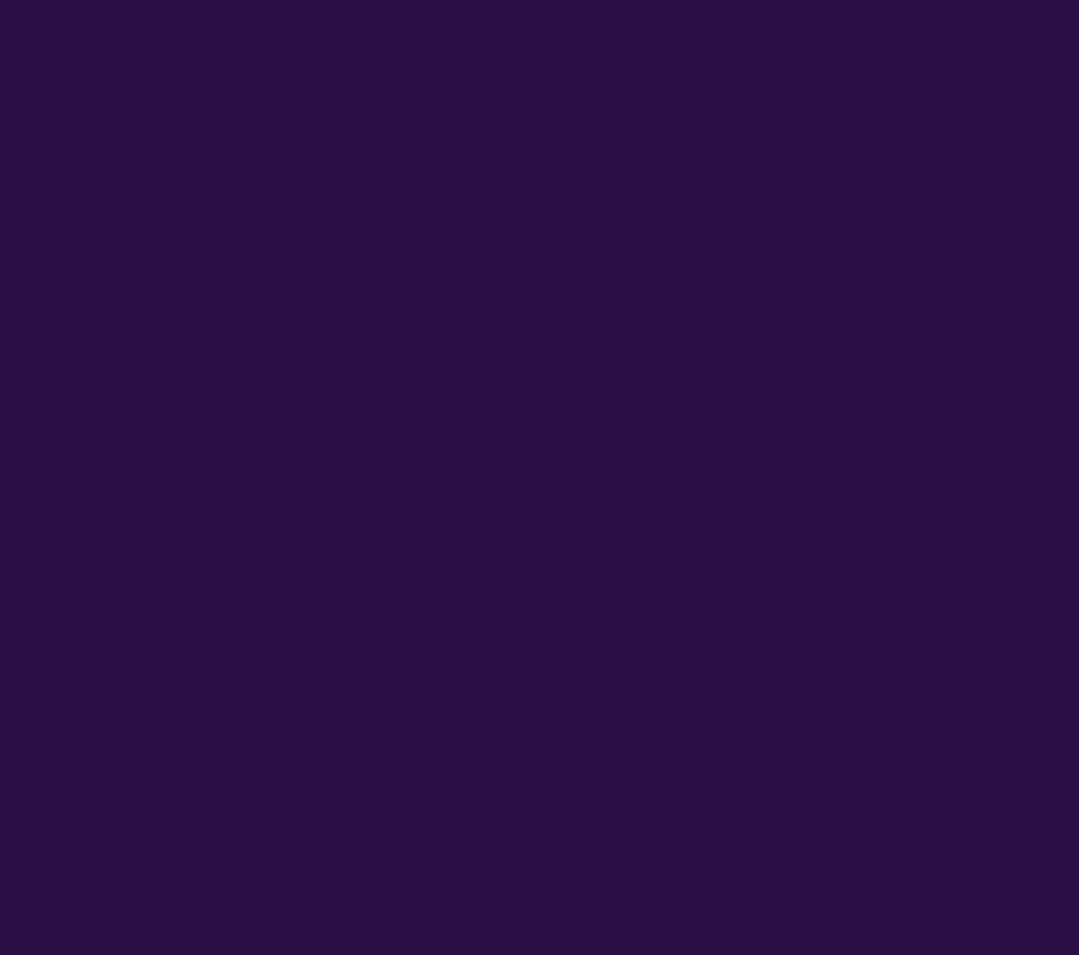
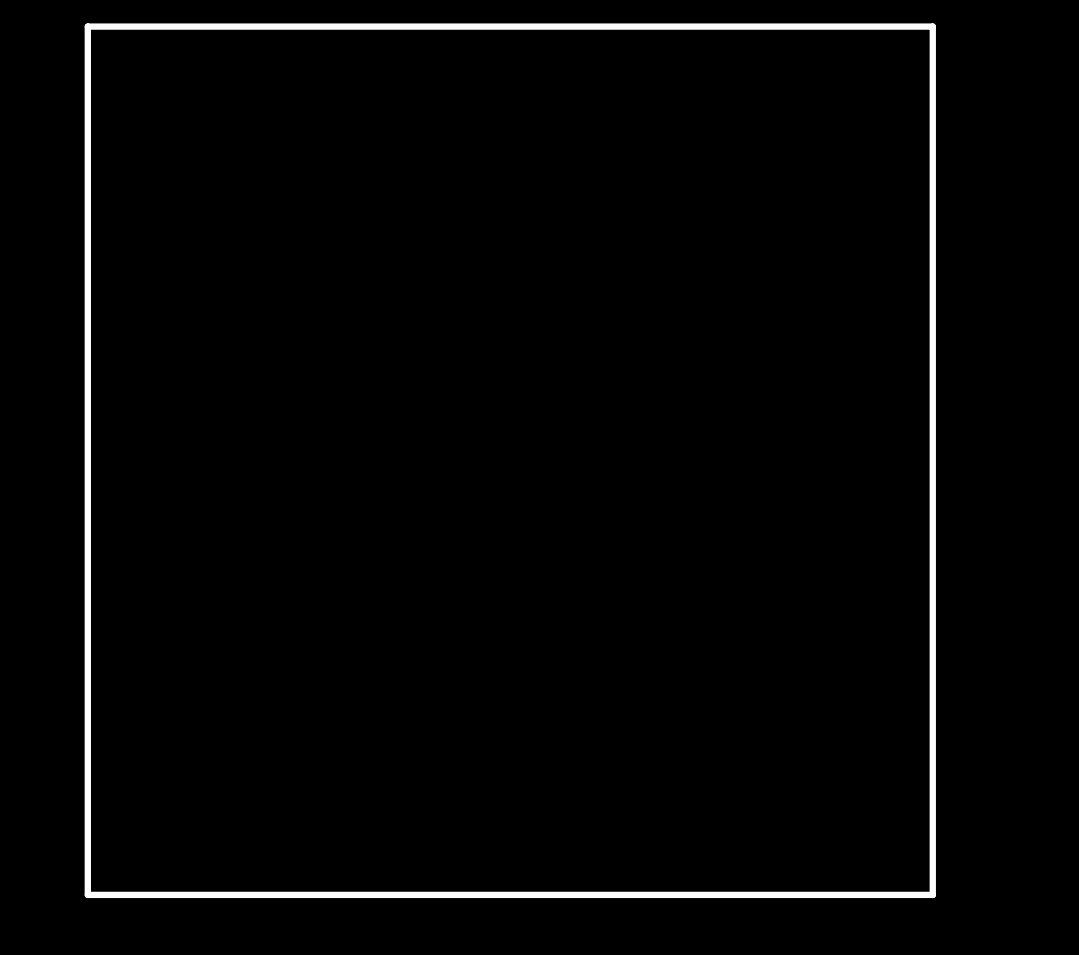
board edge: none -> (932, 26) (87, 26) (87, 894) (932, 894) (932, 26)

